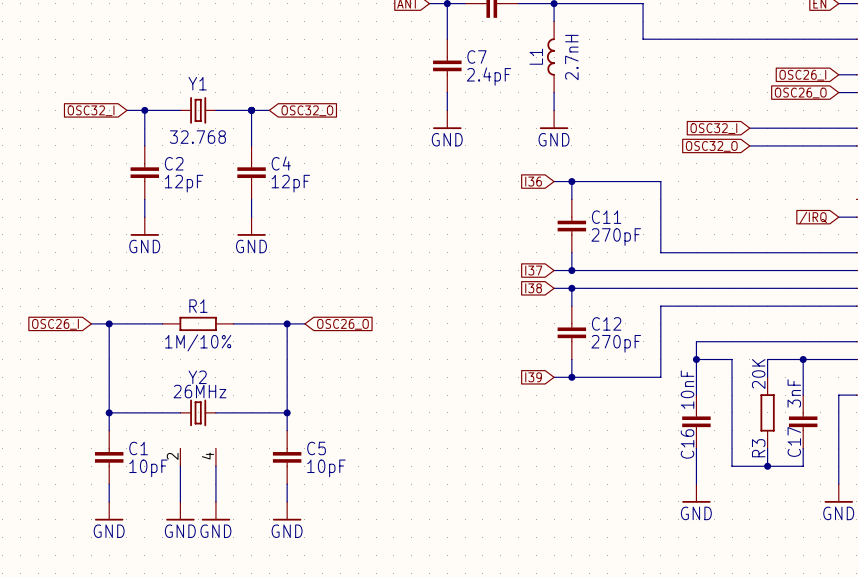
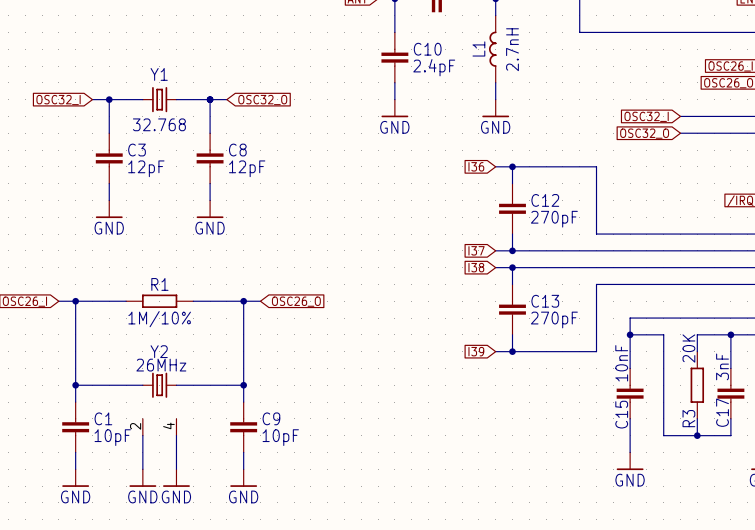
C7 name: C7 (476, 57) -> C10 (427, 49)
C2 name: C2 (174, 163) -> C3 (137, 150)
C4 name: C4 (281, 163) -> C8 (237, 150)
C11 name: C11 (606, 217) -> C12 (545, 200)
C12 name: C12 (606, 323) -> C13 (545, 301)
C16 name: C16 (687, 444) -> C15 (621, 414)
C5 name: C5 (316, 448) -> C9 (271, 418)

